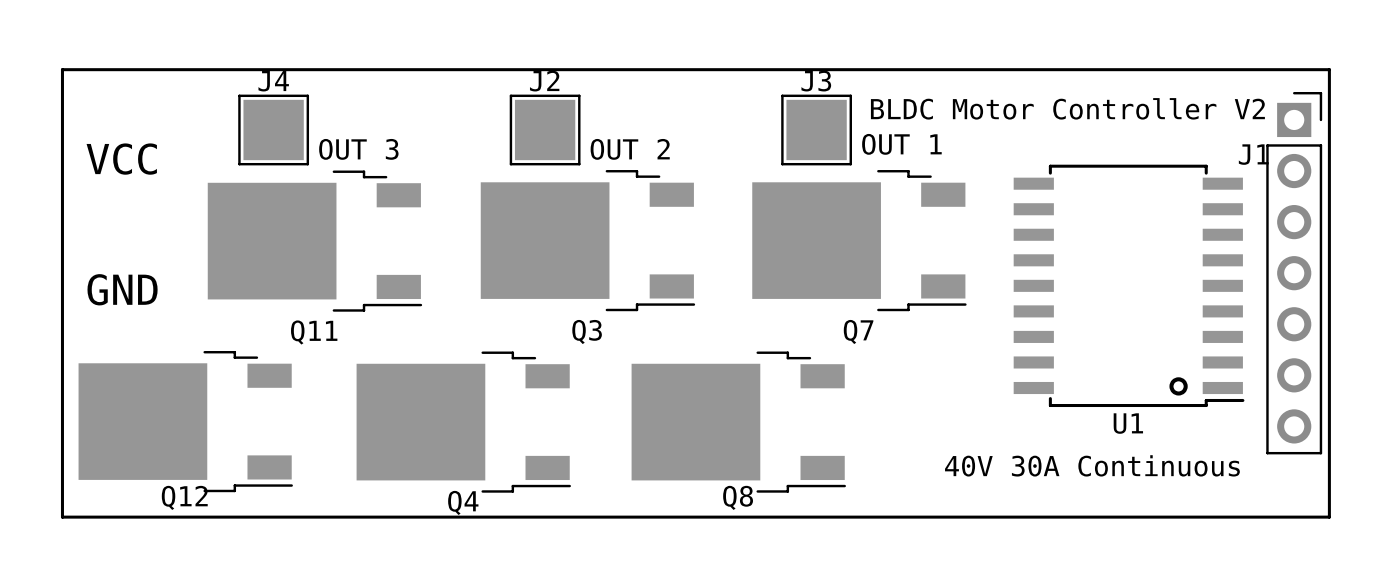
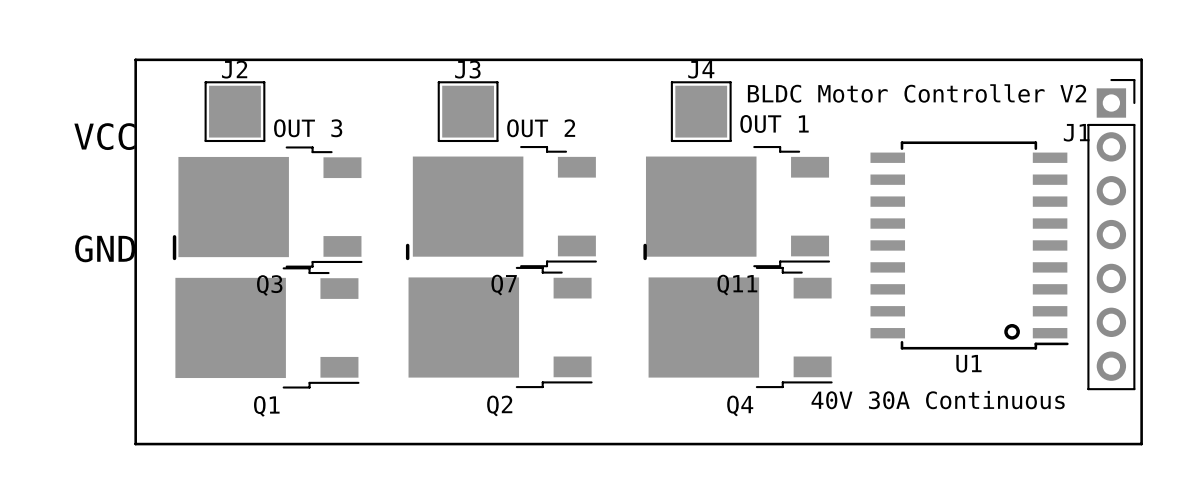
board edge: (157, 69) (62, 69) (62, 517) (157, 517) -> (135, 59) (135, 444)
J4 name: J4 (273, 81) -> J2 (234, 69)
J2 name: J2 (544, 81) -> J3 (467, 69)
J3 name: J3 (816, 81) -> J4 (701, 69)
line: none -> (174, 236) (174, 258)
line: none -> (407, 245) (407, 258)
line: none -> (645, 245) (645, 258)
Q3 name: Q3 (587, 331) -> Q7 (504, 285)
Q7 name: Q7 (858, 331) -> Q11 (737, 285)
Q11 name: Q11 (314, 332) -> Q3 (269, 285)
Q1: none -> (267, 327)
Q2: none -> (500, 327)
Q12: (185, 421) -> none
Q4 position: (463, 422) -> (740, 327)
Q8: (738, 422) -> none
Q4 name position: Q4 (463, 502) -> Q4 (740, 405)

